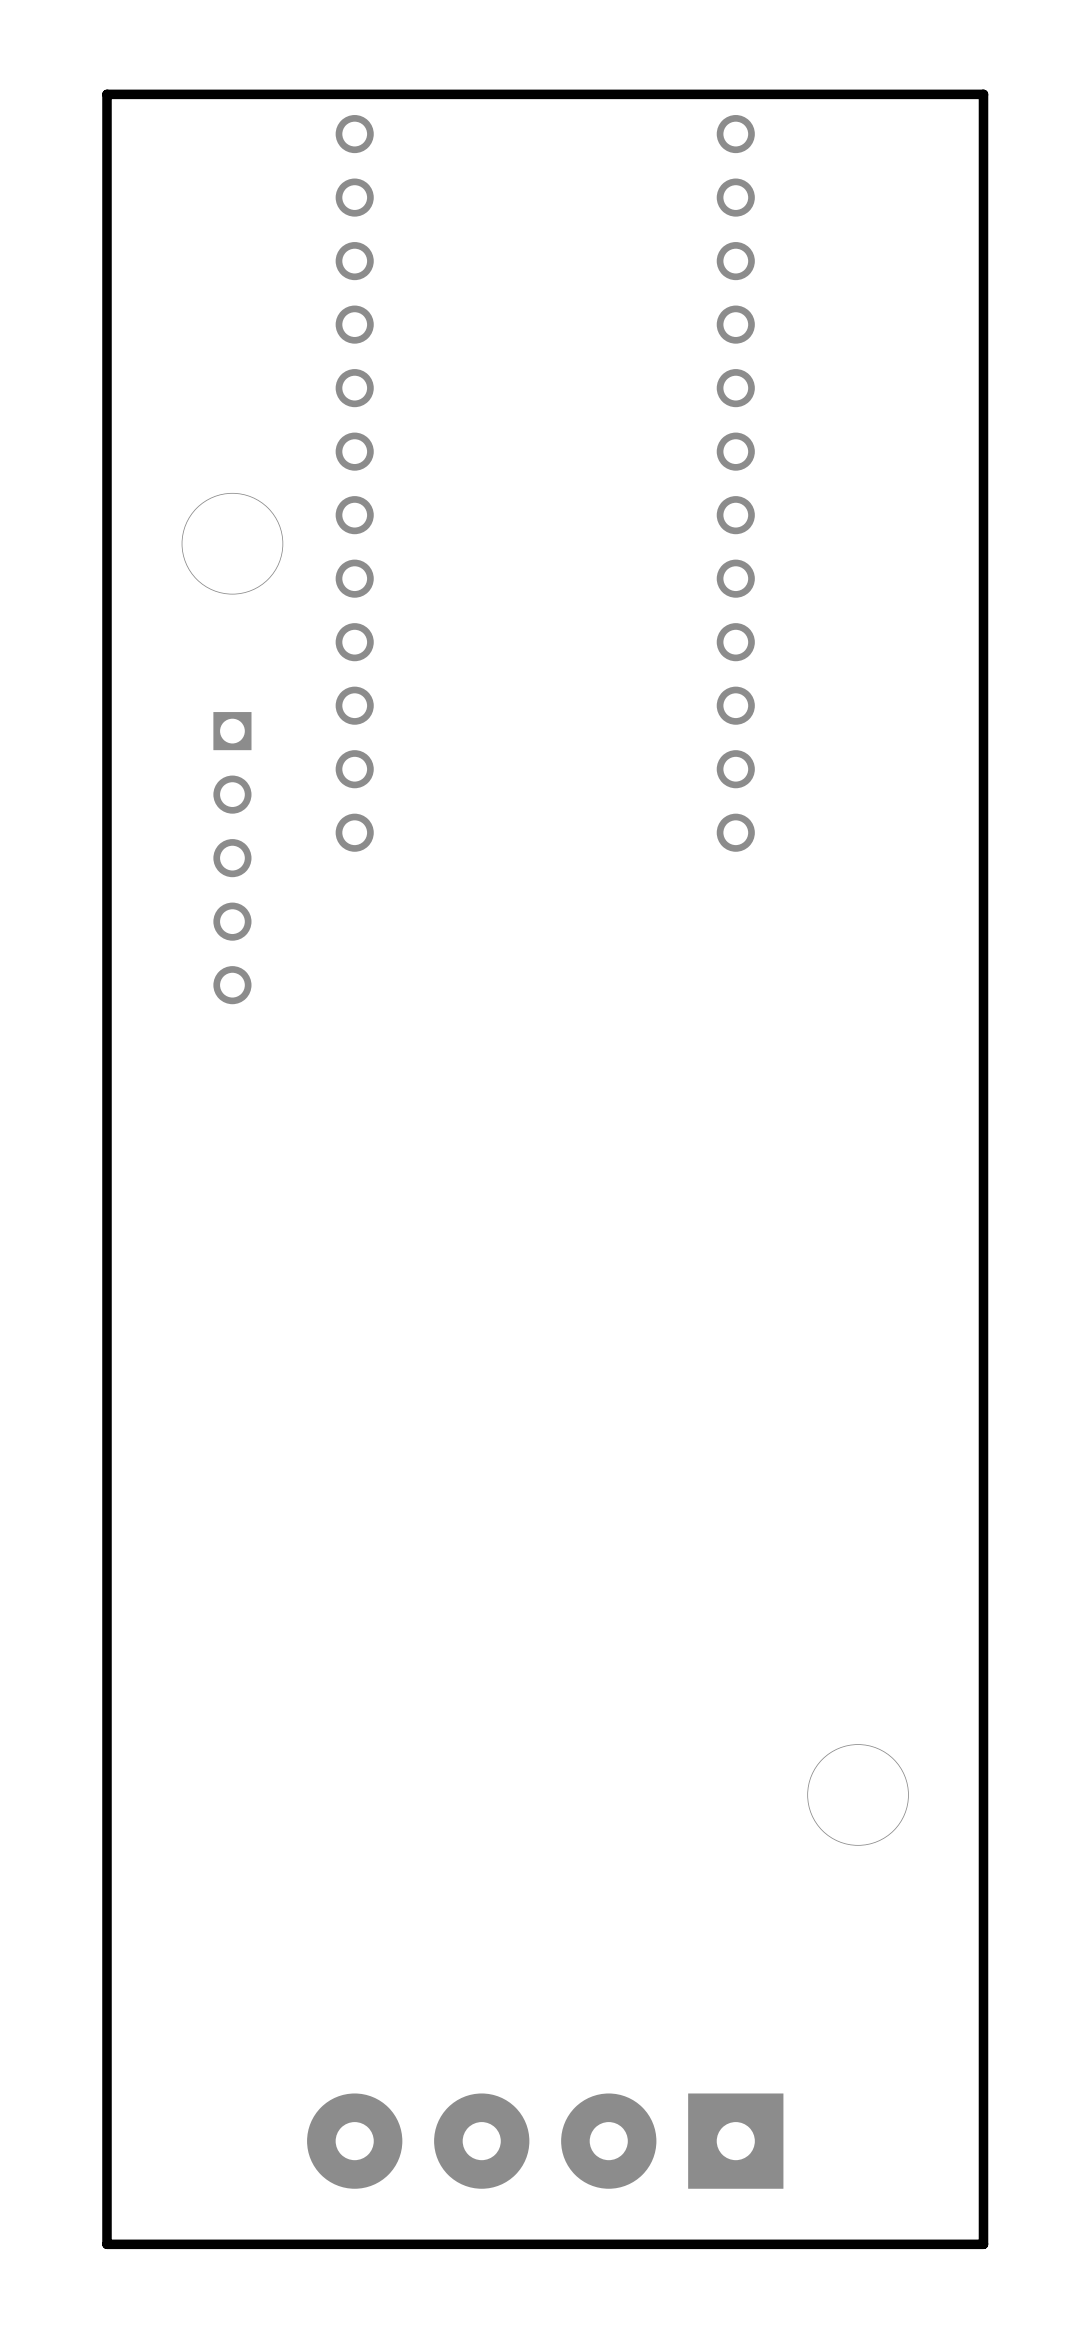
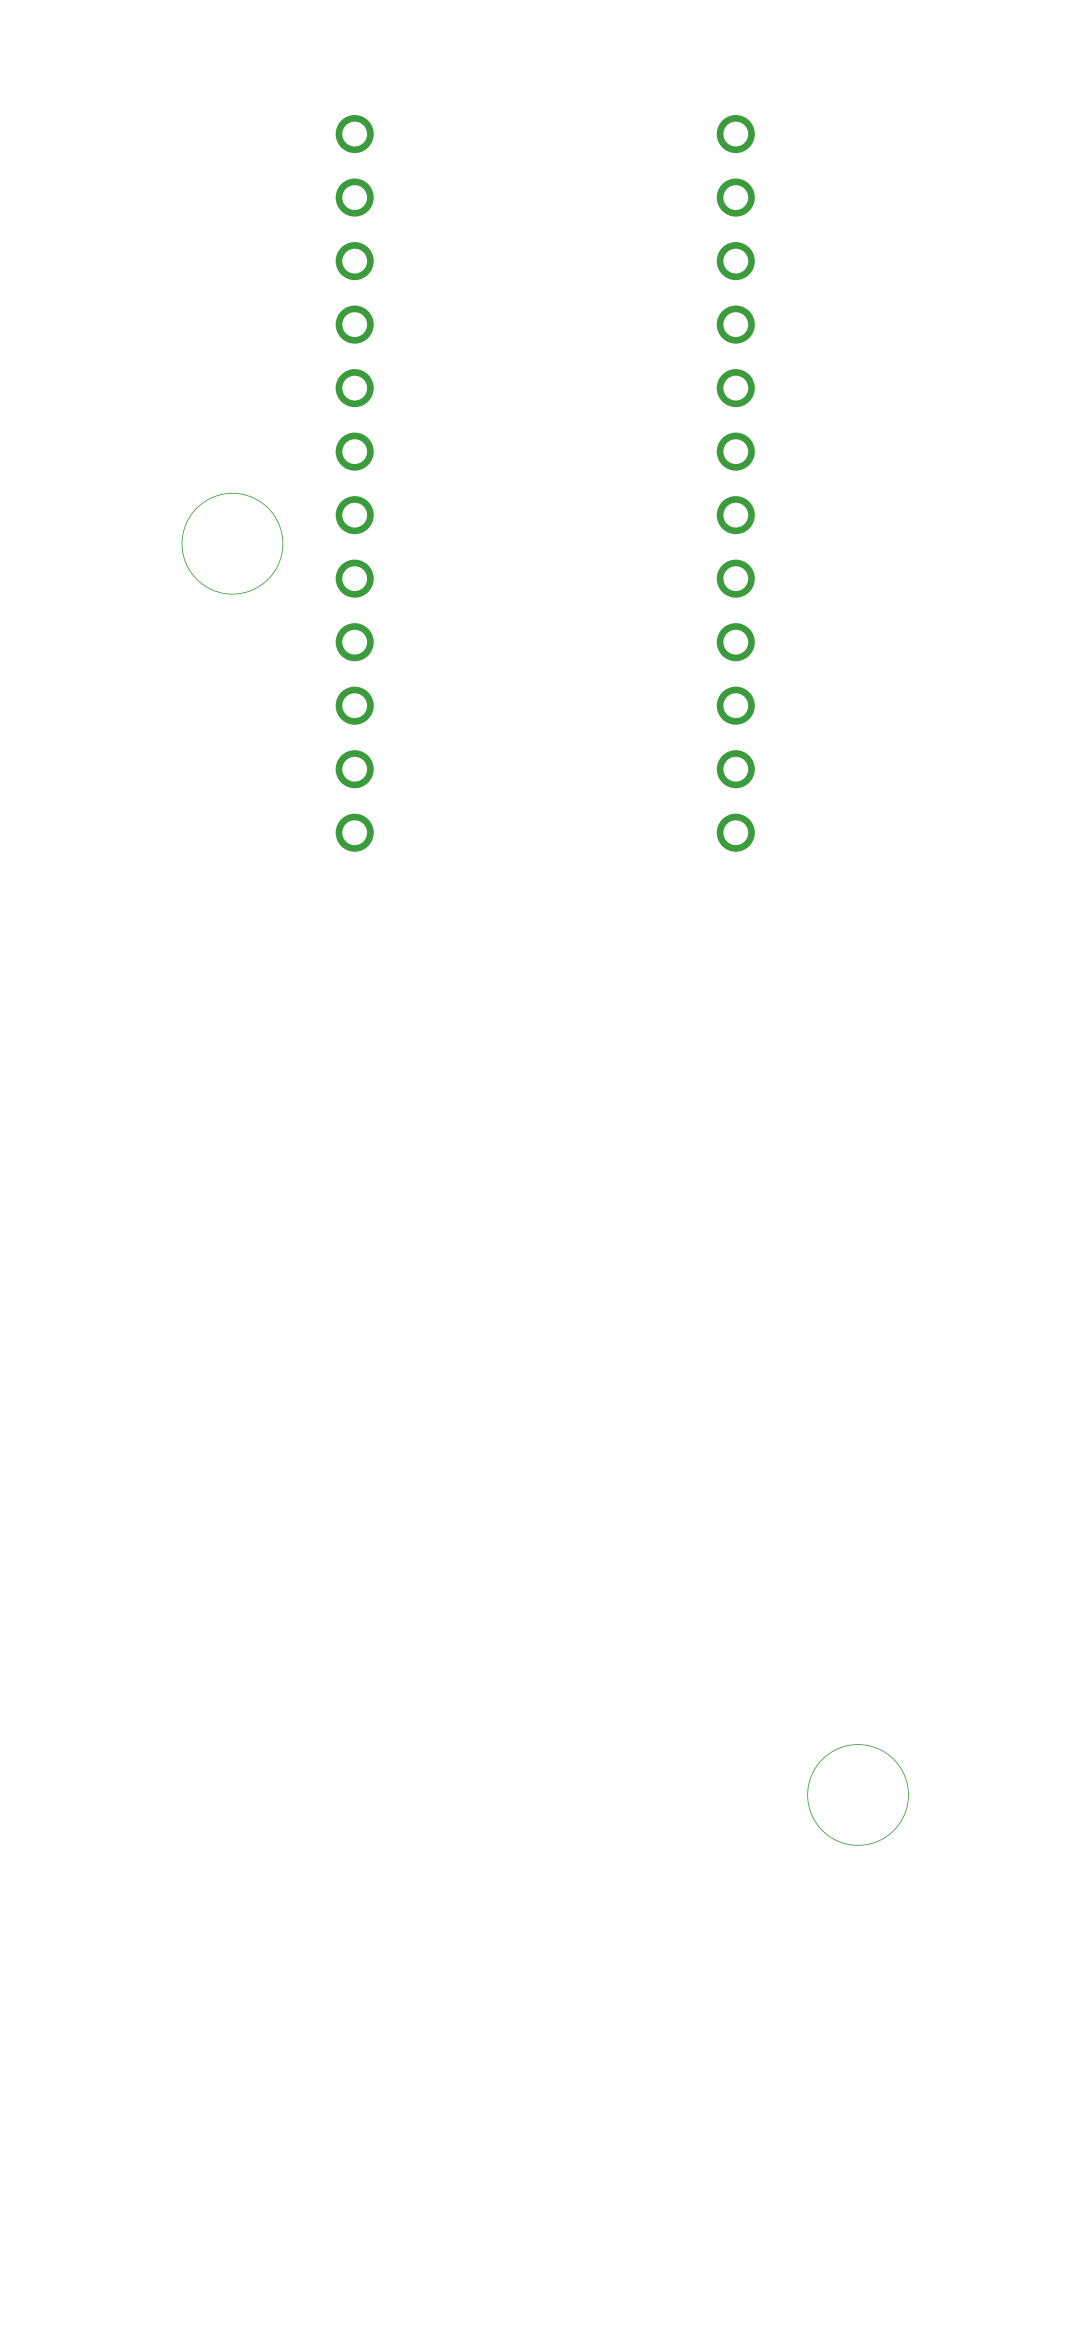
board edge: (983, 94) (106, 94) (106, 2244) (983, 2244) (983, 94) -> none
part: (232, 858) -> none
part: (545, 2141) -> none

